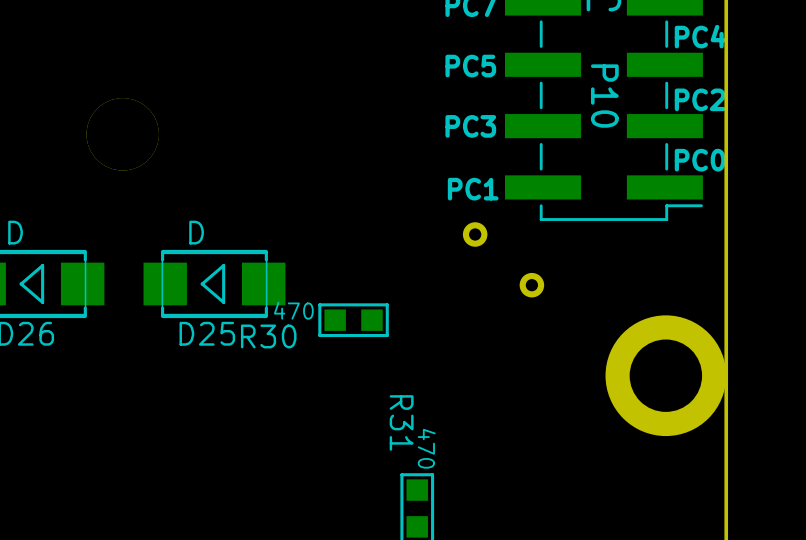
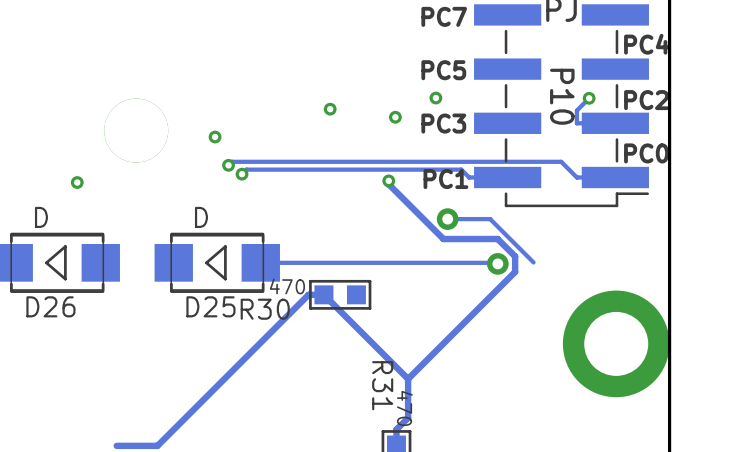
via: none -> (435, 98)
track: none -> (589, 98) (576, 110) (576, 123) (615, 123)
via: none -> (589, 98)
via: none -> (330, 109)
via: none -> (395, 117)
via: none -> (215, 137)
track: none -> (228, 165) (232, 161) (561, 161) (576, 177) (615, 177)
via: none -> (228, 165)
track: none -> (242, 174) (246, 169) (461, 169) (469, 177) (507, 177)
via: none -> (242, 174)
track: none -> (388, 180) (388, 184) (443, 239) (497, 239) (515, 256) (515, 271) (408, 378)
via: none -> (388, 180)
via: none -> (77, 182)
track: none -> (447, 219) (490, 219) (533, 262)
track: none -> (260, 262) (497, 263)
track: none -> (408, 378) (323, 294) (308, 294) (157, 445) (116, 445)
track: none -> (408, 378) (408, 417) (396, 429) (396, 444)

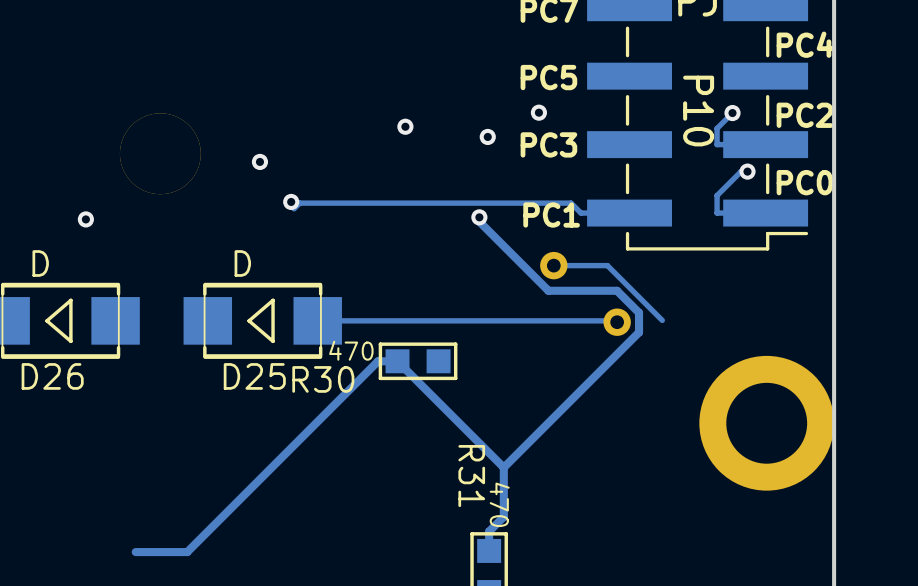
via: none -> (747, 171)
track: (228, 165) (232, 161) (561, 161) (576, 177) -> (747, 171) (741, 171) (717, 195) (717, 213)
via: (228, 165) -> none
via: none -> (291, 201)
via: (242, 174) -> none

